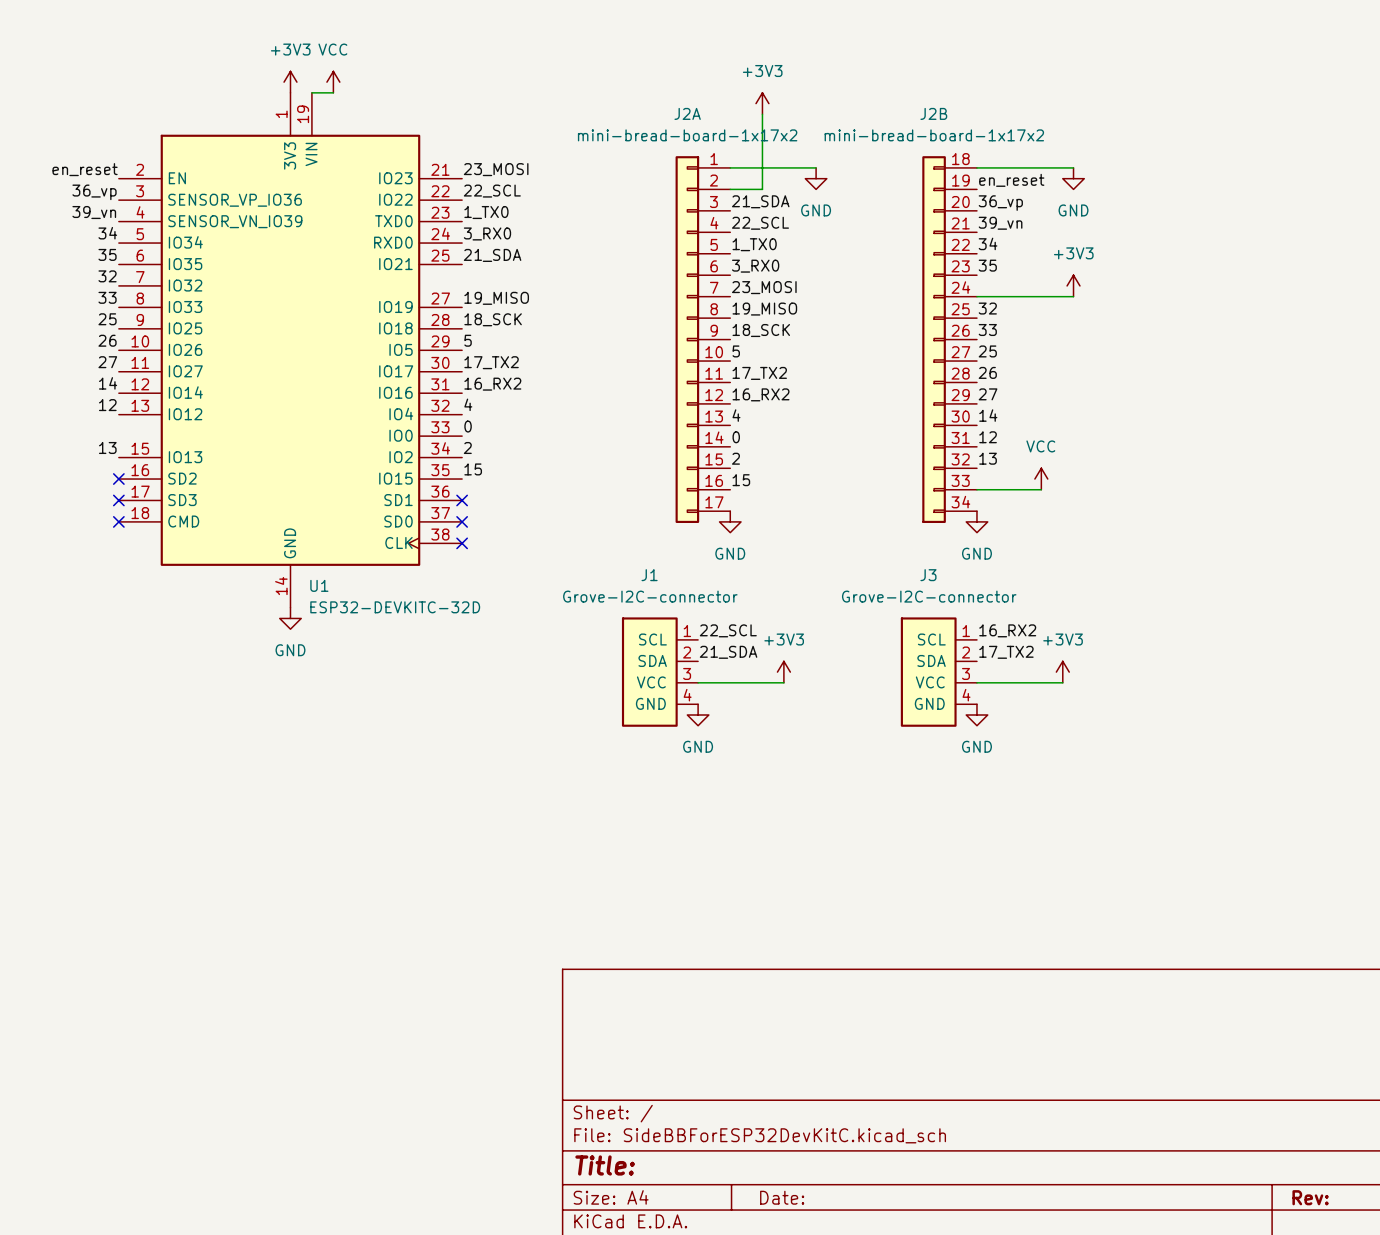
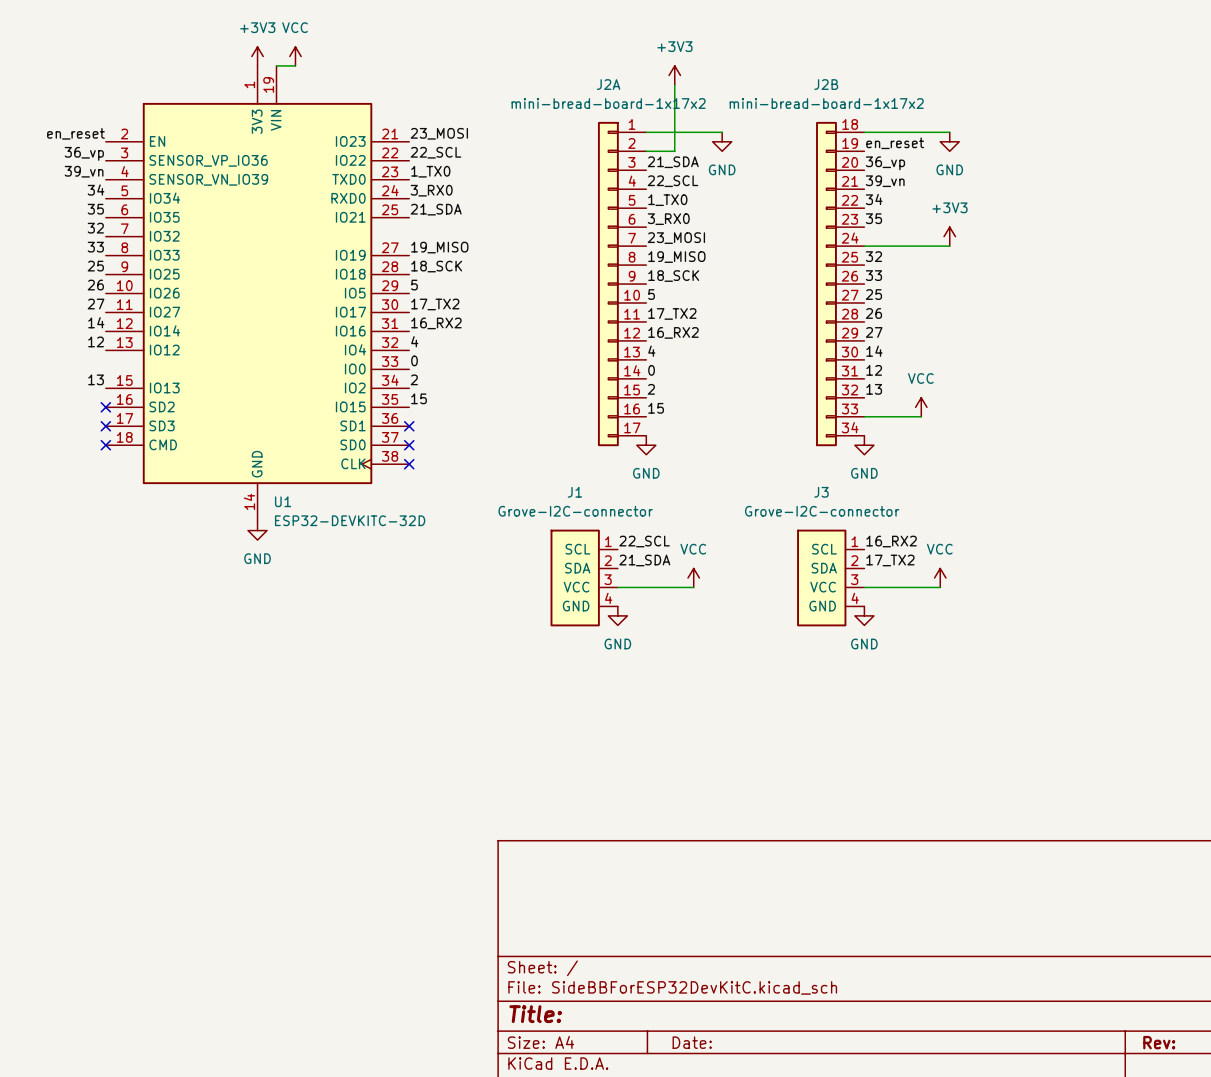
power symbol: +3V3 (783, 672) -> VCC (693, 577)
power symbol: +3V3 (1062, 672) -> VCC (940, 577)

